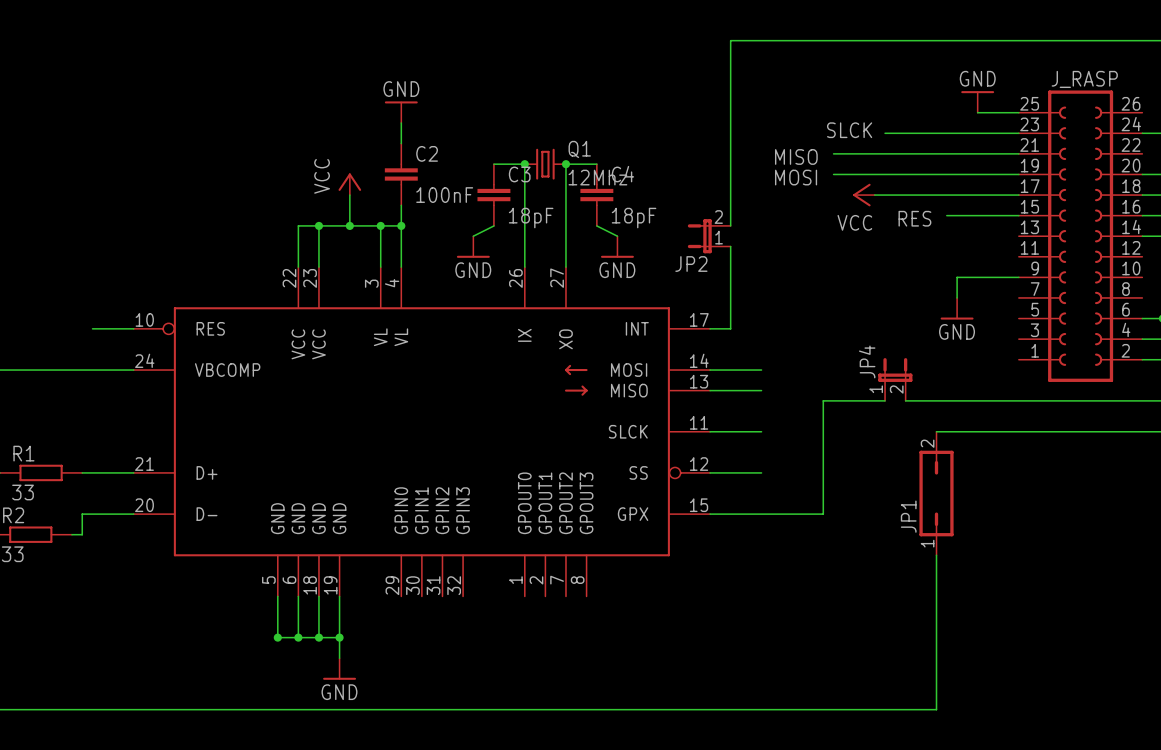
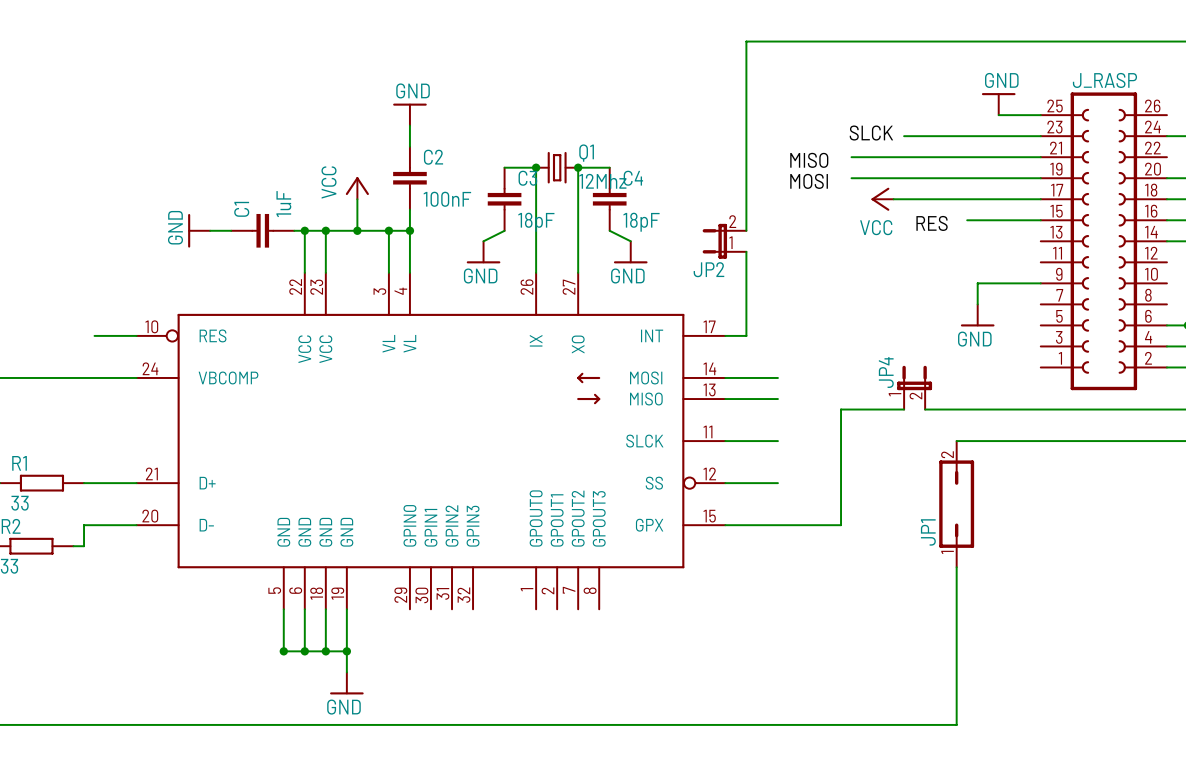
power symbol: none -> GND (199, 230)
wire: none -> (210, 230) (231, 230)
C1: none -> 1uF (262, 230)
wire: none -> (294, 230) (304, 230)
junction: none -> (304, 230)

